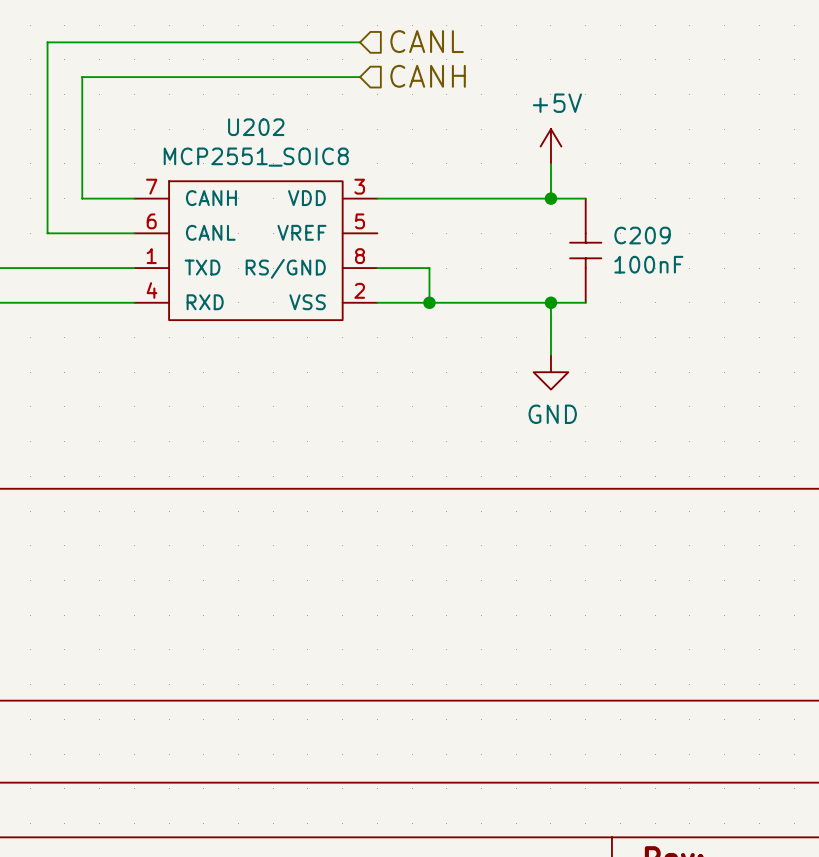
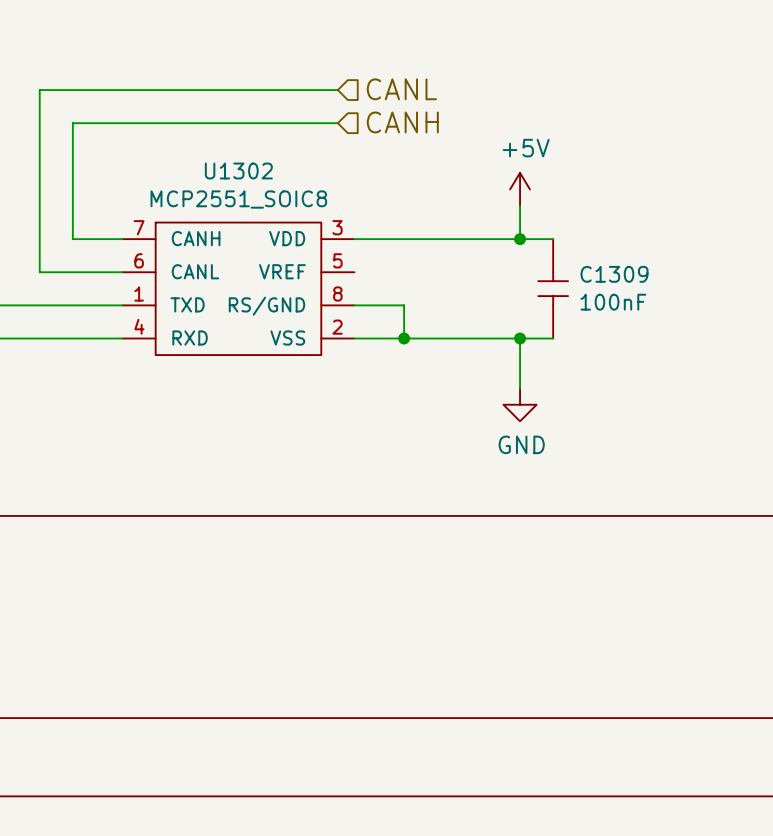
U202 name: U202 (256, 127) -> U1302 (238, 170)
C209 name: C209 (642, 235) -> C1309 (614, 274)

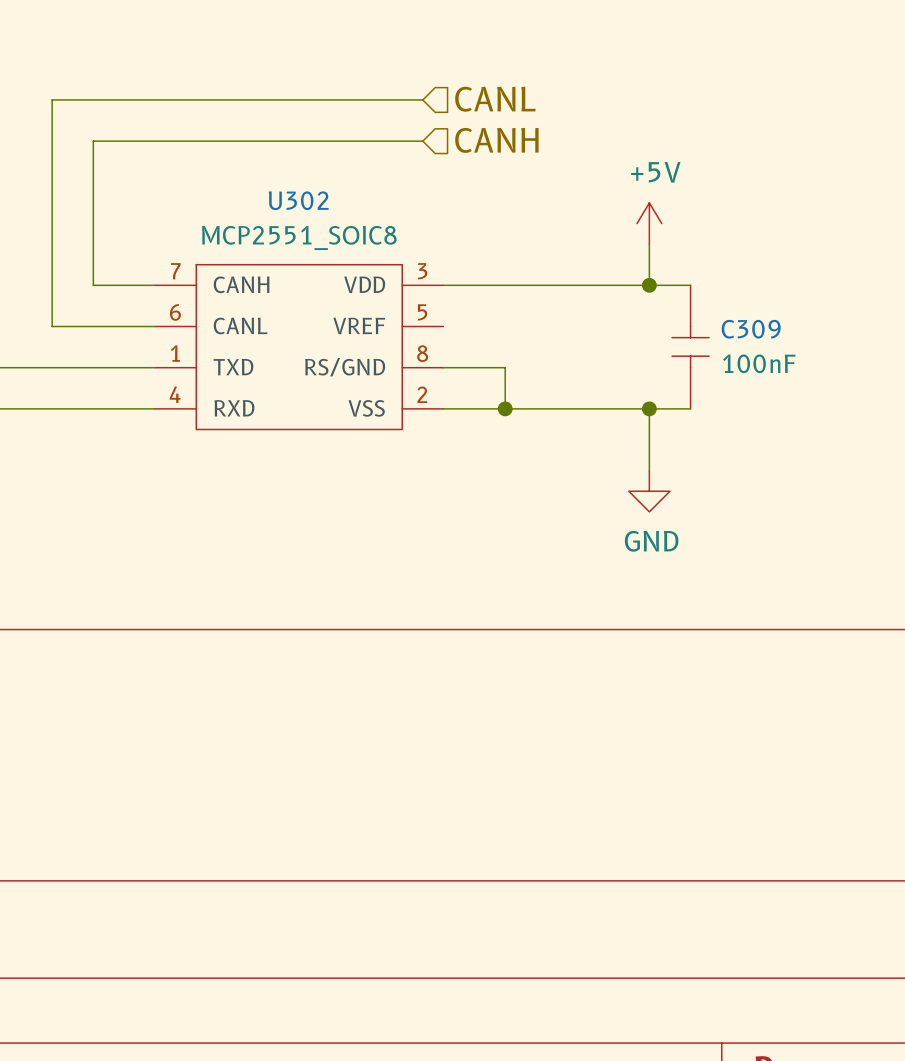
U1302 name: U1302 (238, 170) -> U302 (298, 200)
C1309 name: C1309 (614, 274) -> C309 (751, 329)

